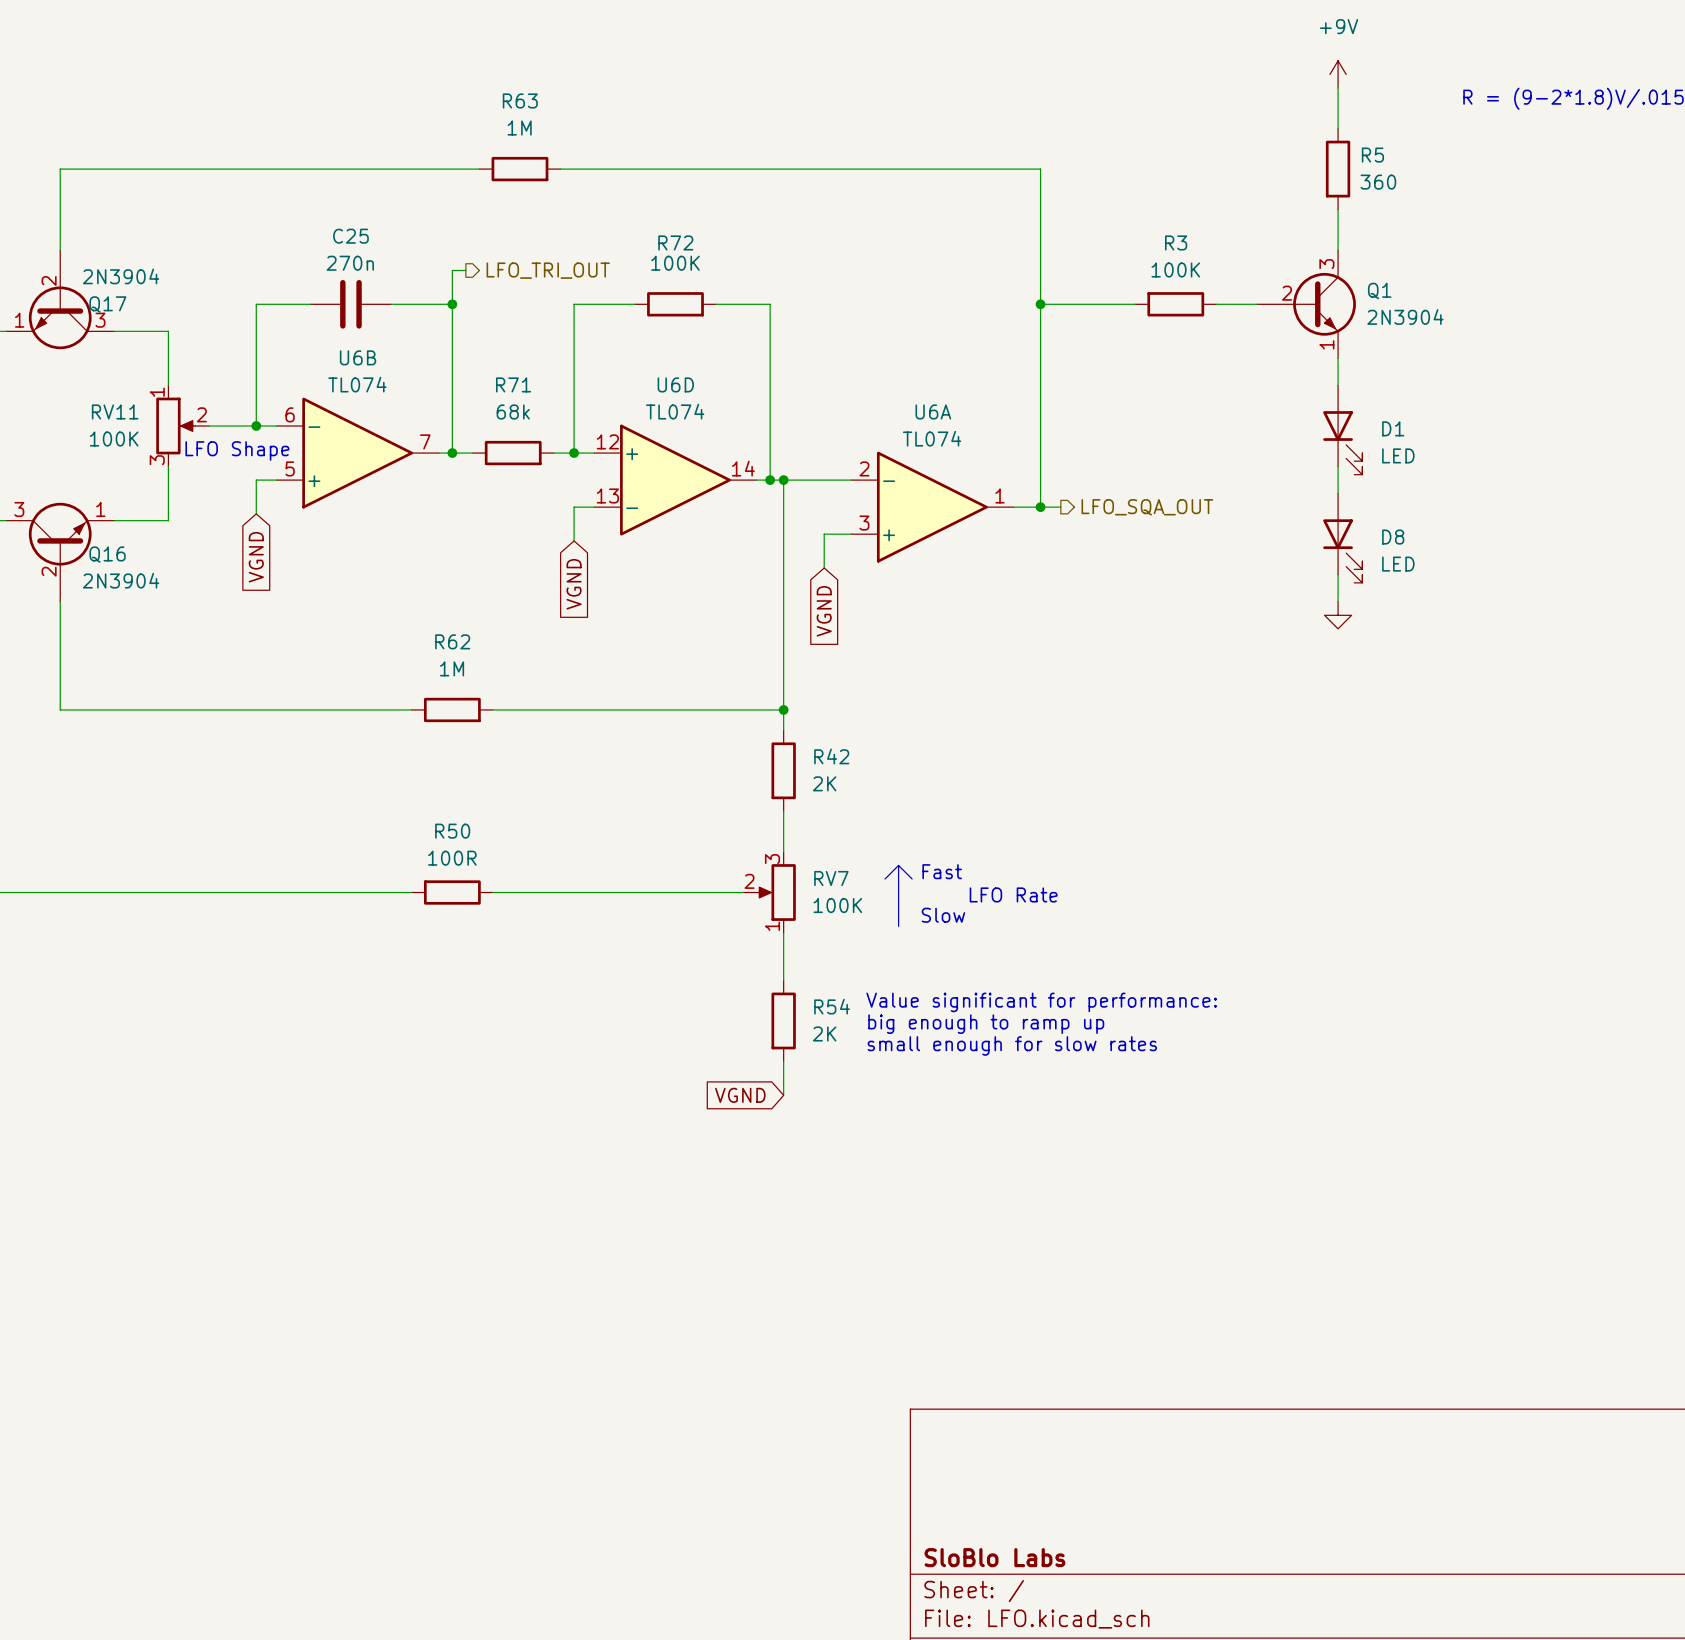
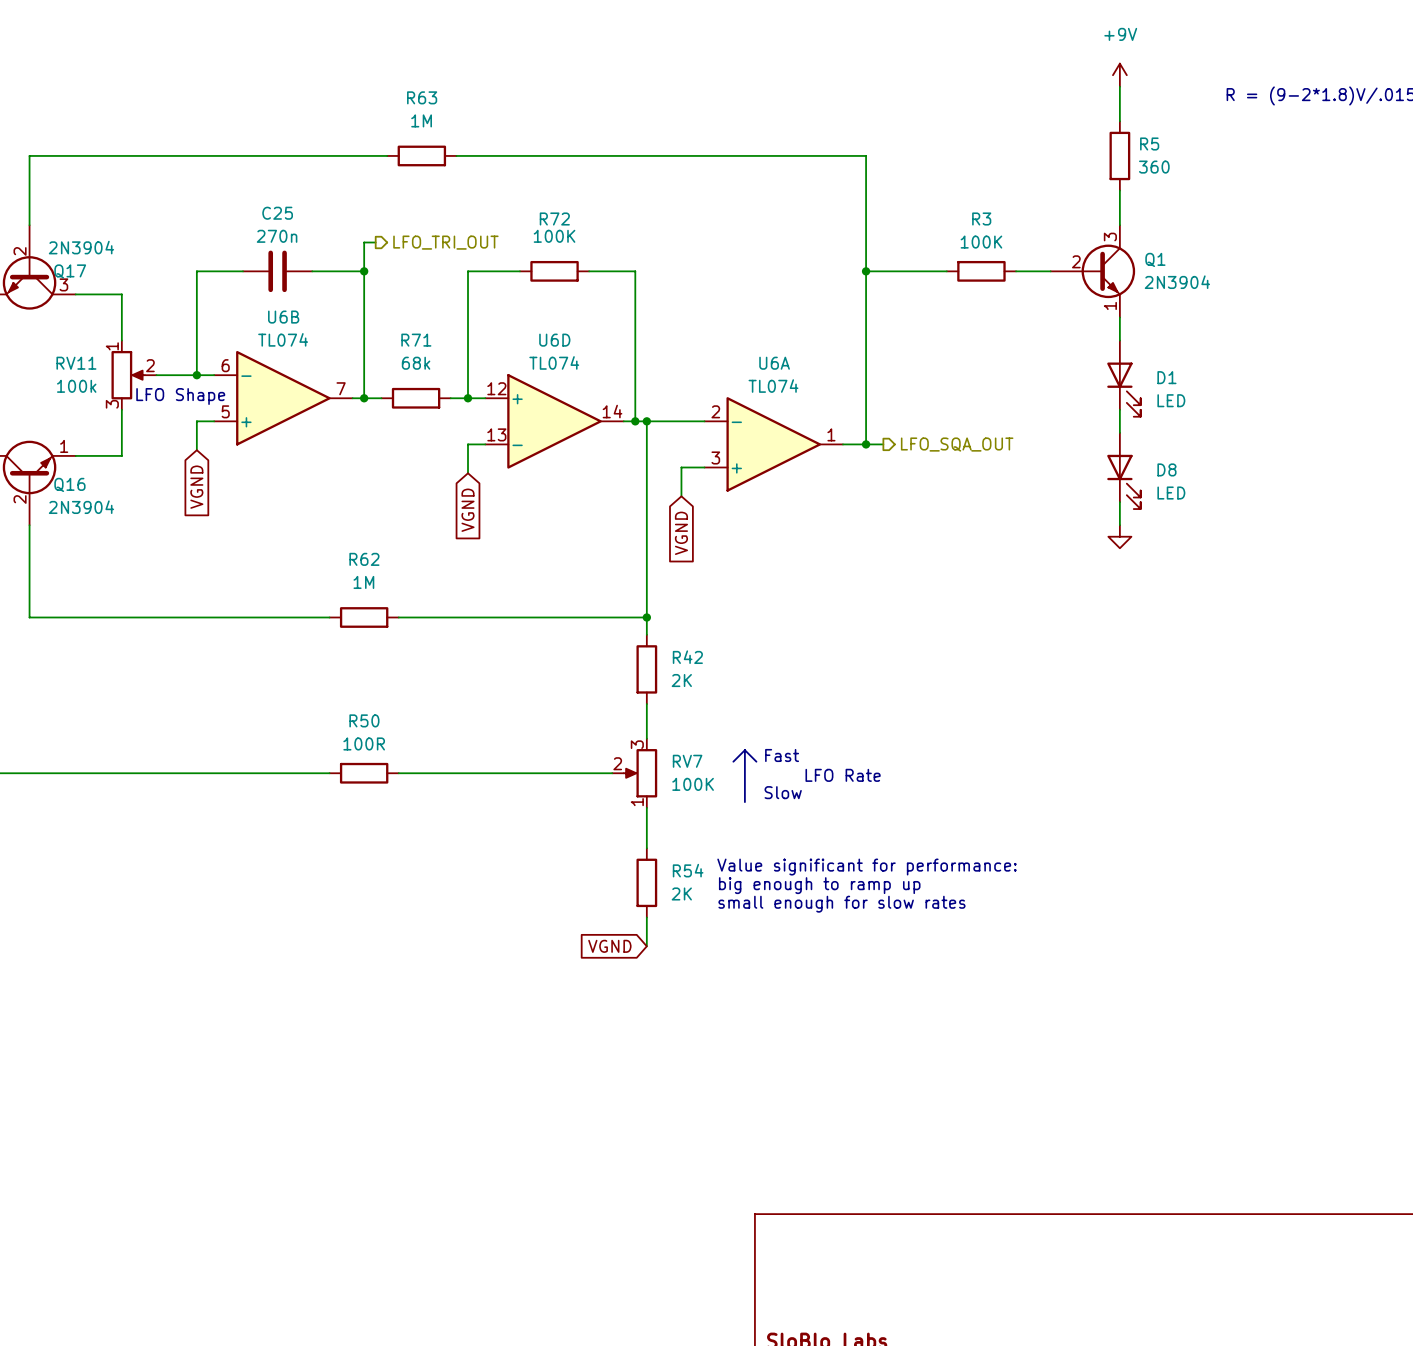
RV11 value: 100K (114, 439) -> 100k (76, 386)

